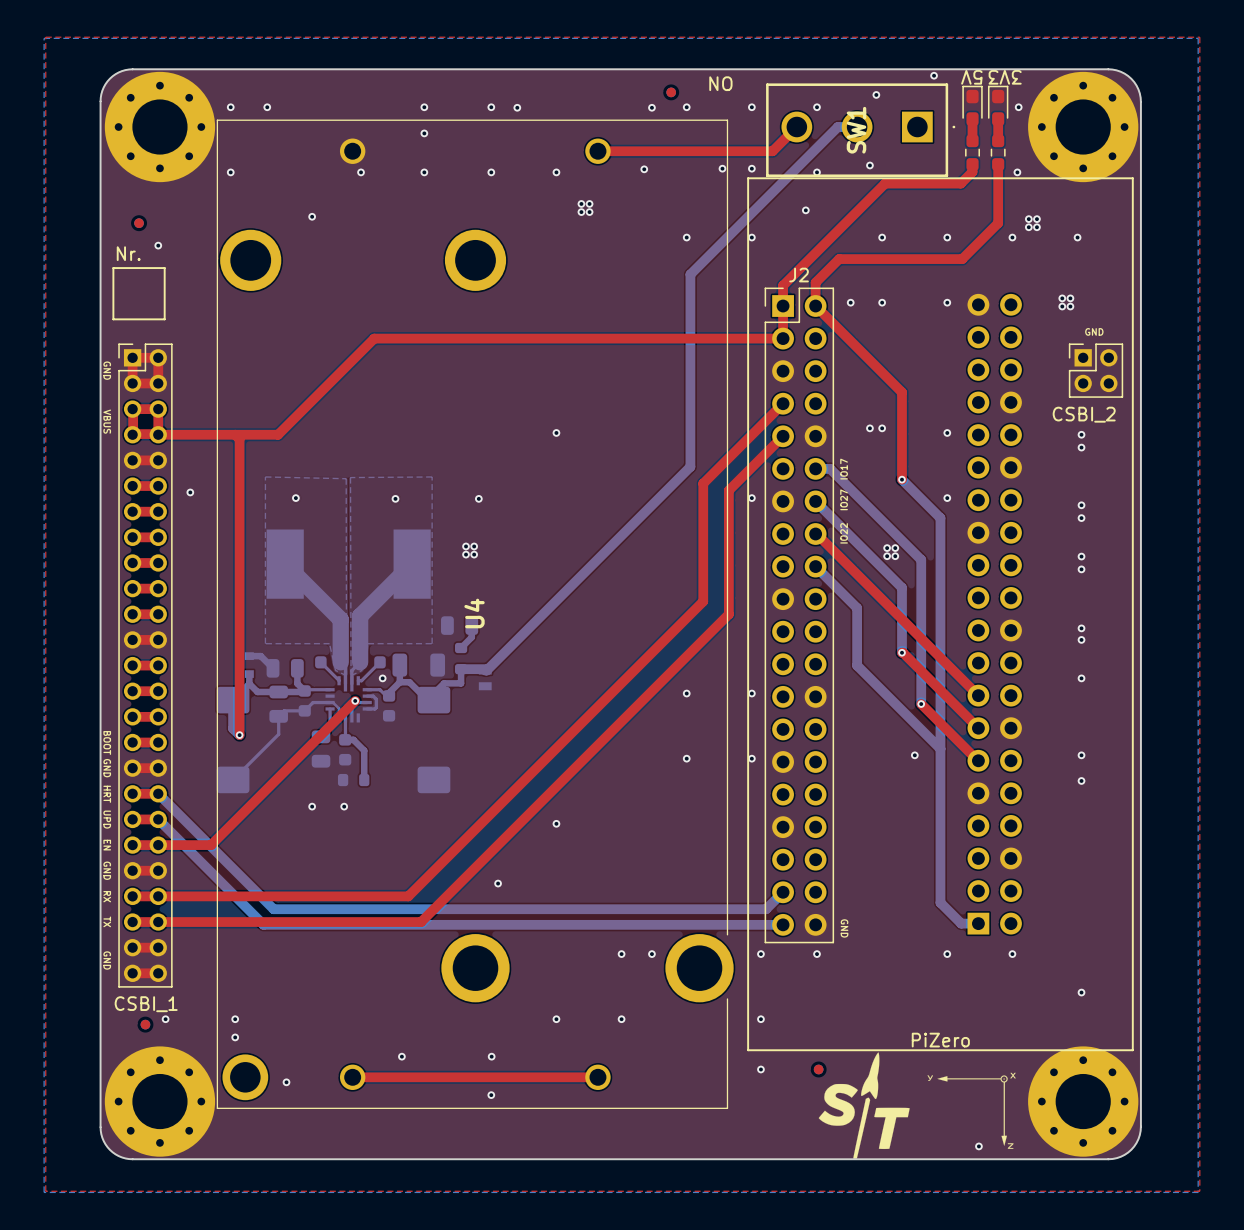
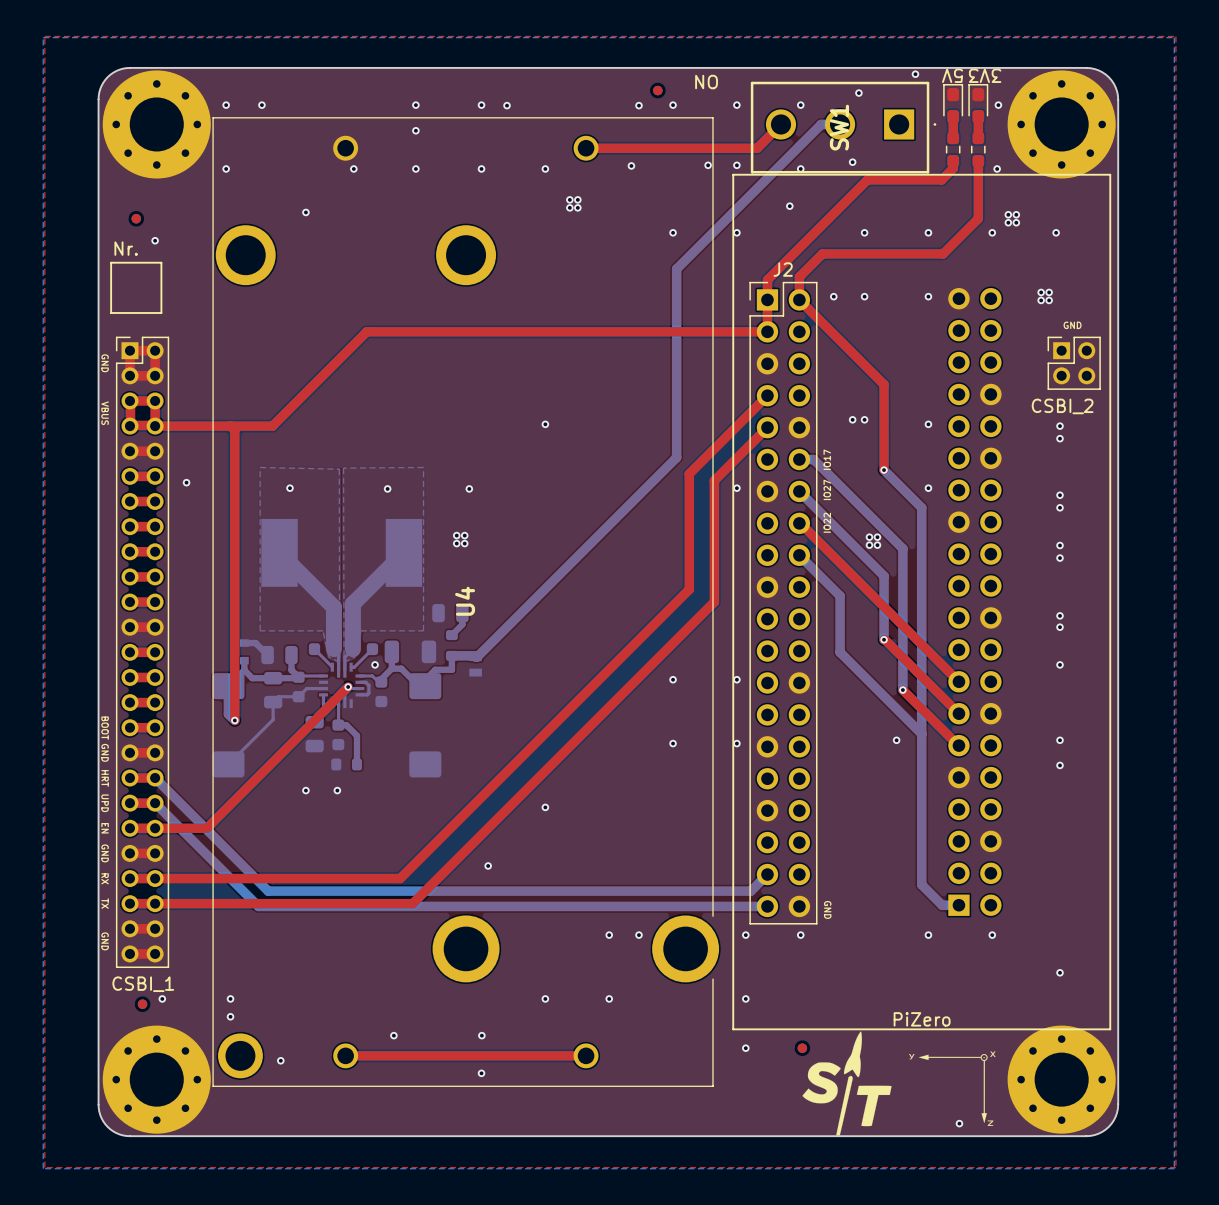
bottom track: (330, 702) (333, 702) (339, 708) (339, 717) -> none

